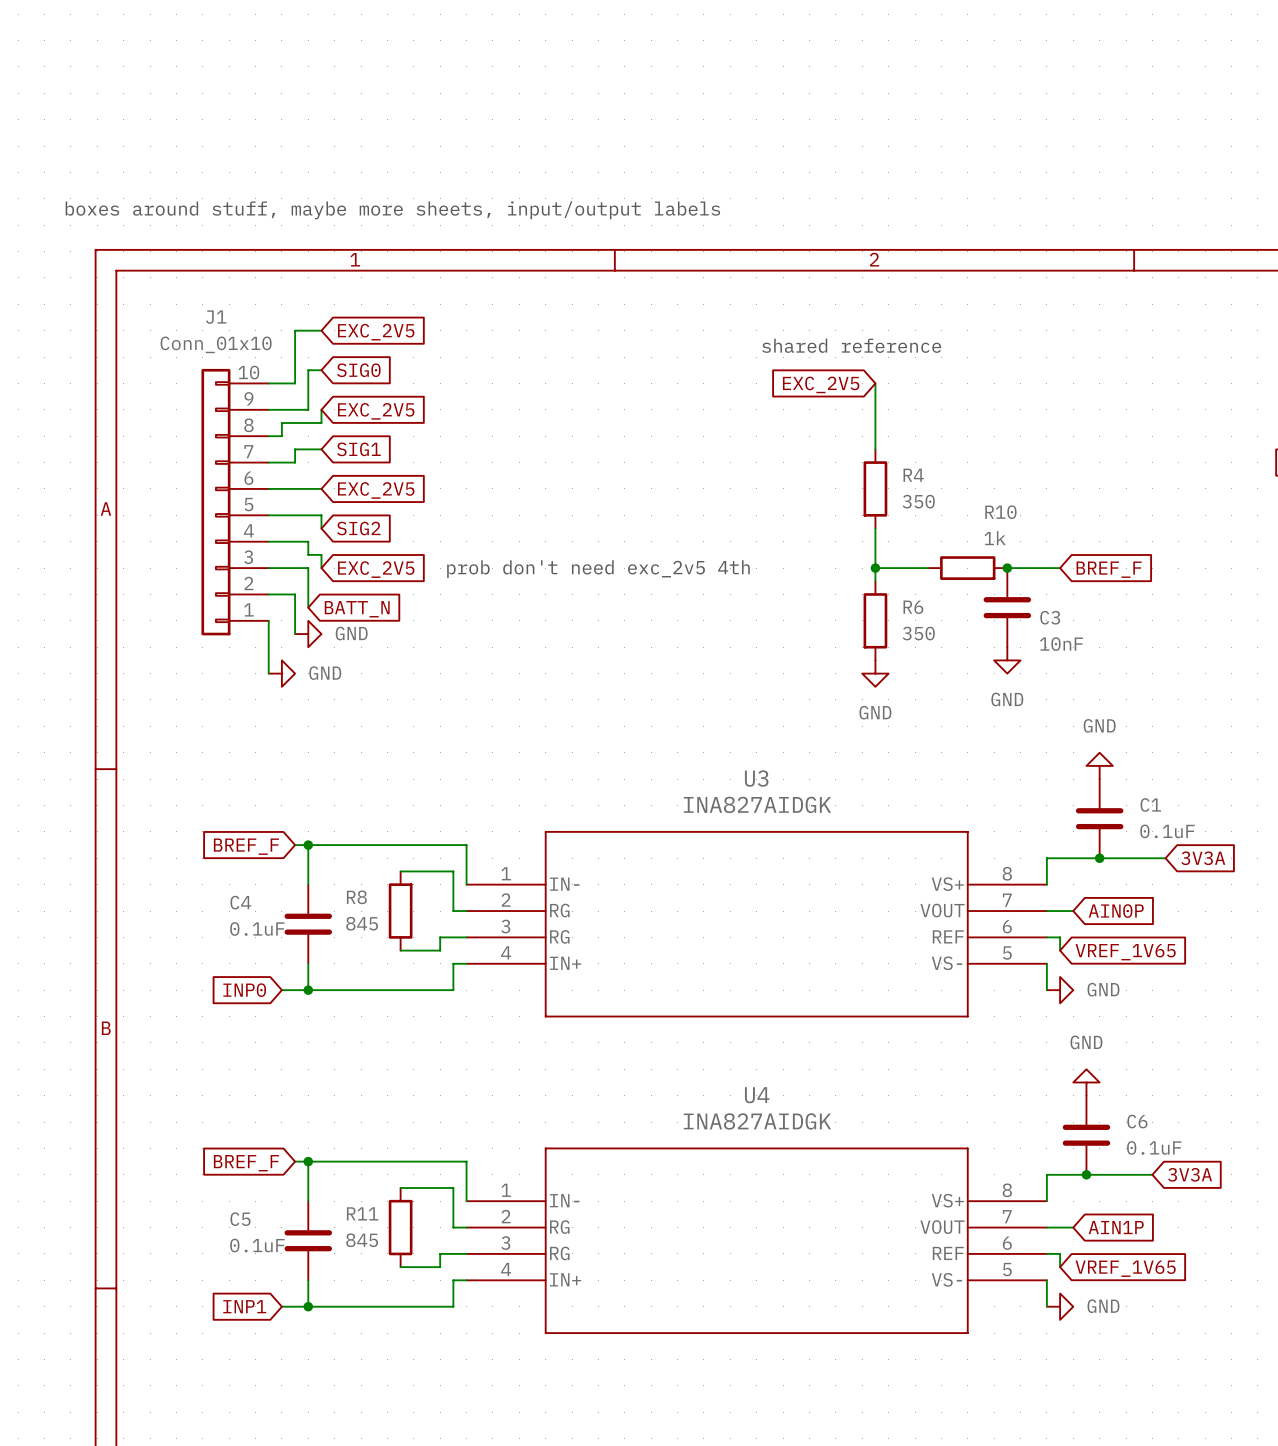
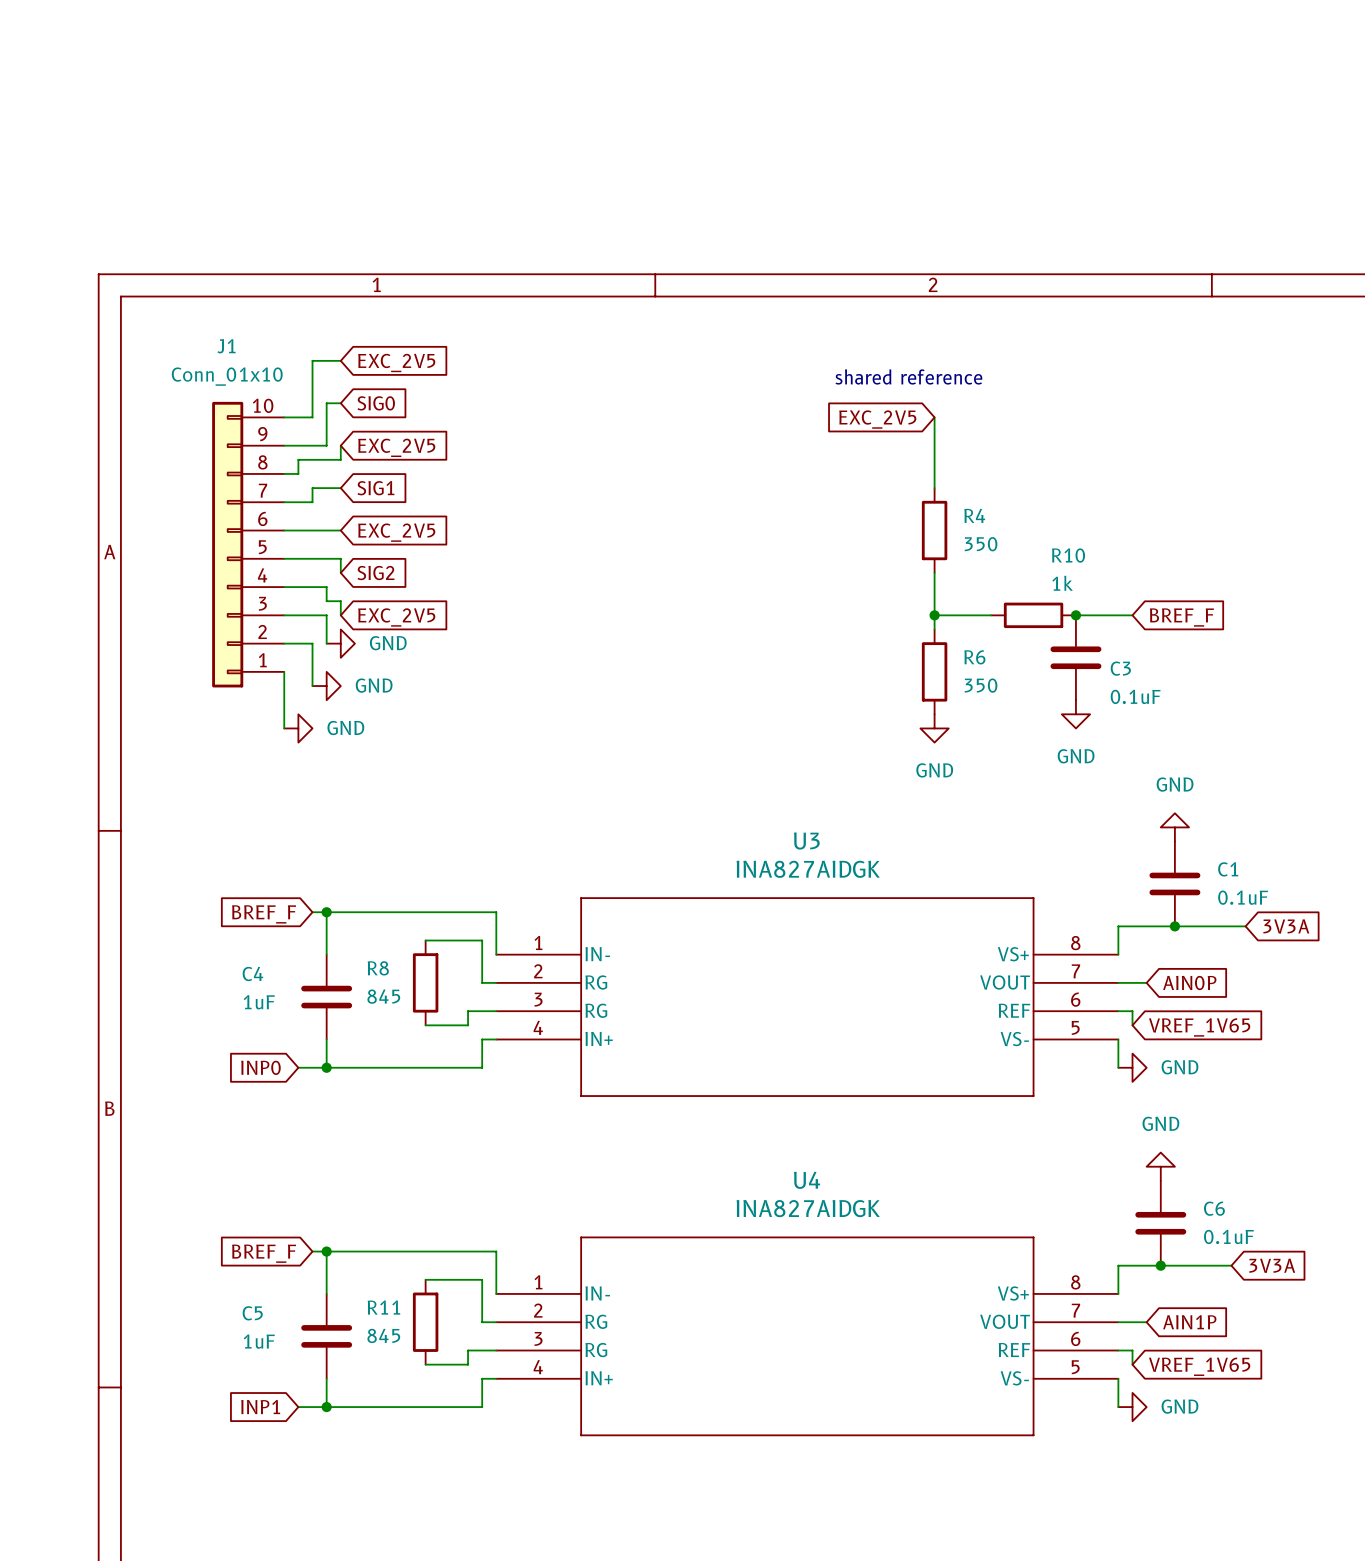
text: boxes around stuff, maybe more sheets, input/output labels (392, 210) -> none
text: prob don't need exc_2v5 4th (598, 569) -> none
wire: (308, 594) (308, 607) -> none
power symbol: none -> GND (340, 643)
global label: BATT_N (357, 609) -> none
C3 value: 10nF (1061, 644) -> 0.1uF (1135, 696)
C4 value: 0.1uF (257, 928) -> 1uF (259, 1002)
C5 value: 0.1uF (257, 1245) -> 1uF (259, 1341)

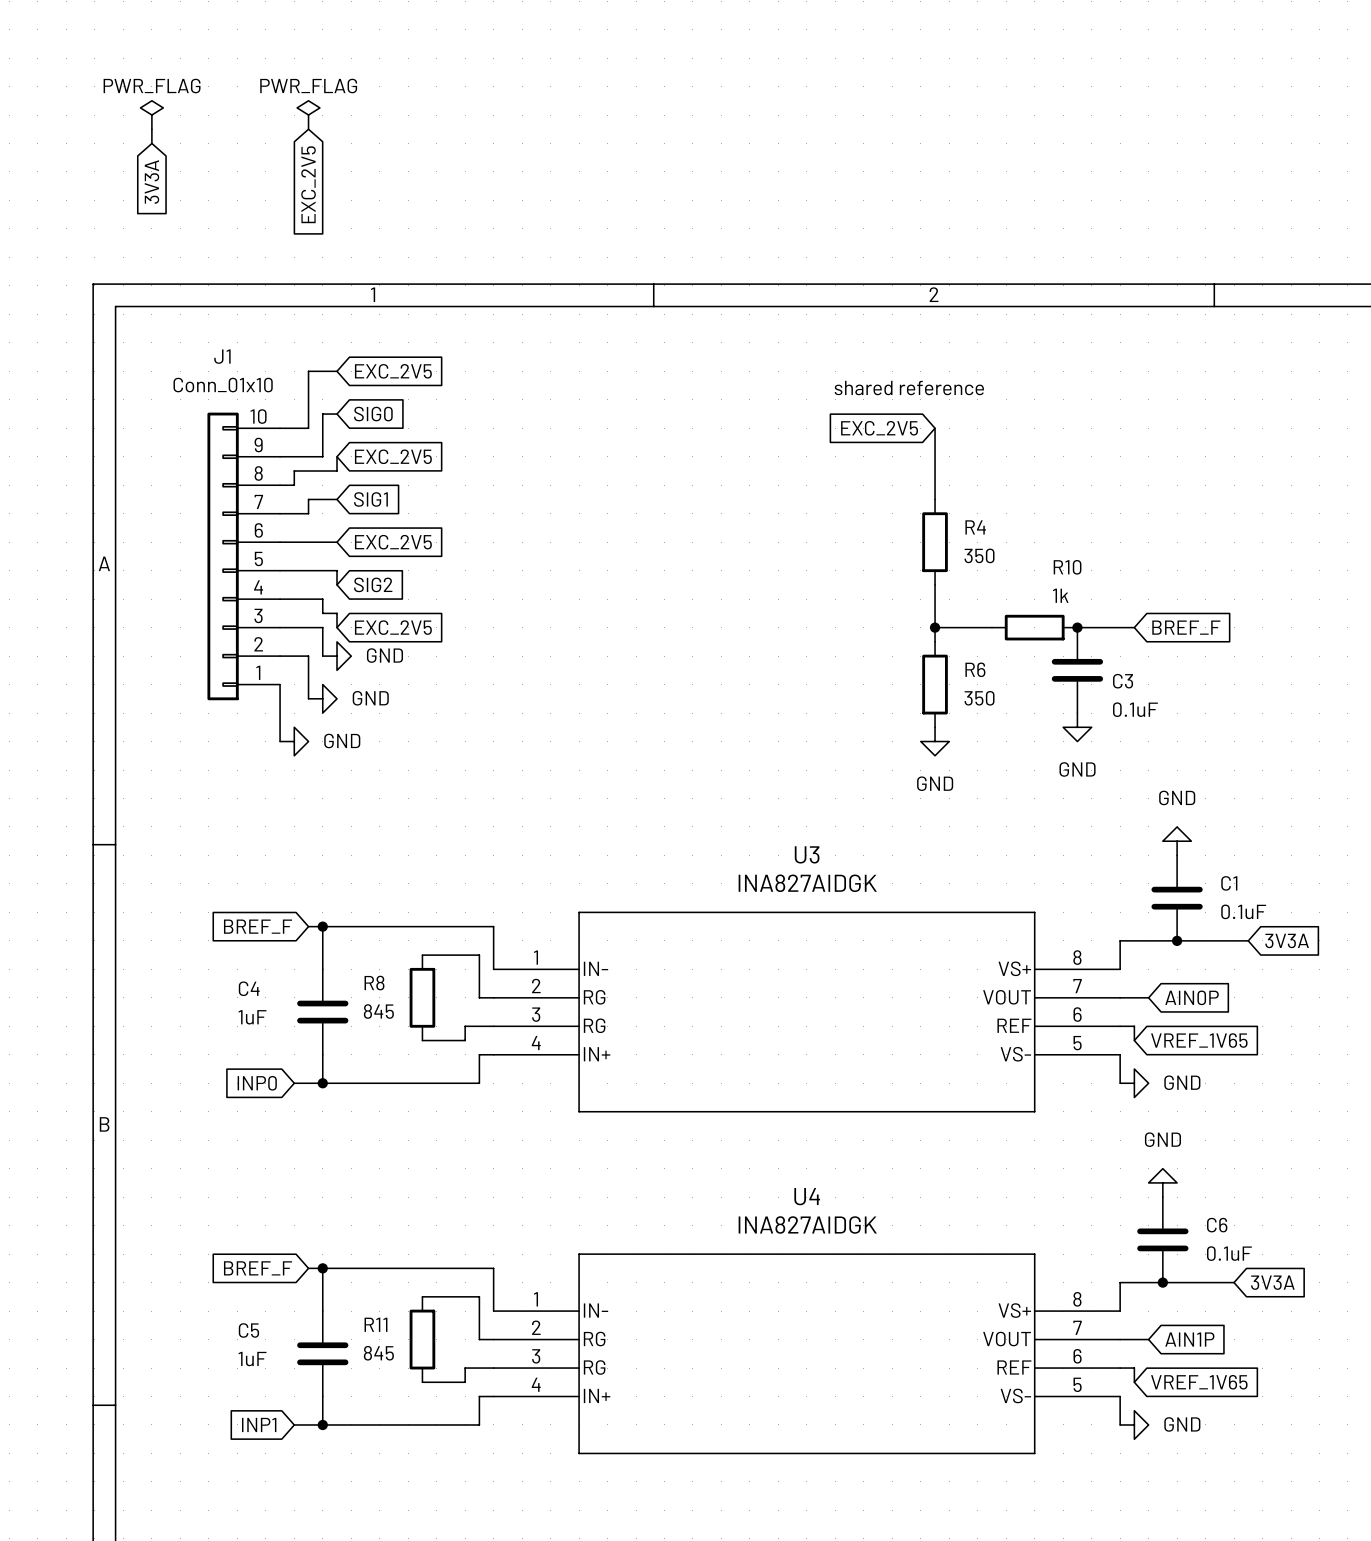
power symbol: none -> PWR_FLAG (151, 115)
power symbol: none -> PWR_FLAG (308, 115)
wire: none -> (151, 129) (151, 143)
global label: none -> 3V3A (151, 182)
global label: none -> EXC_2V5 (308, 184)

